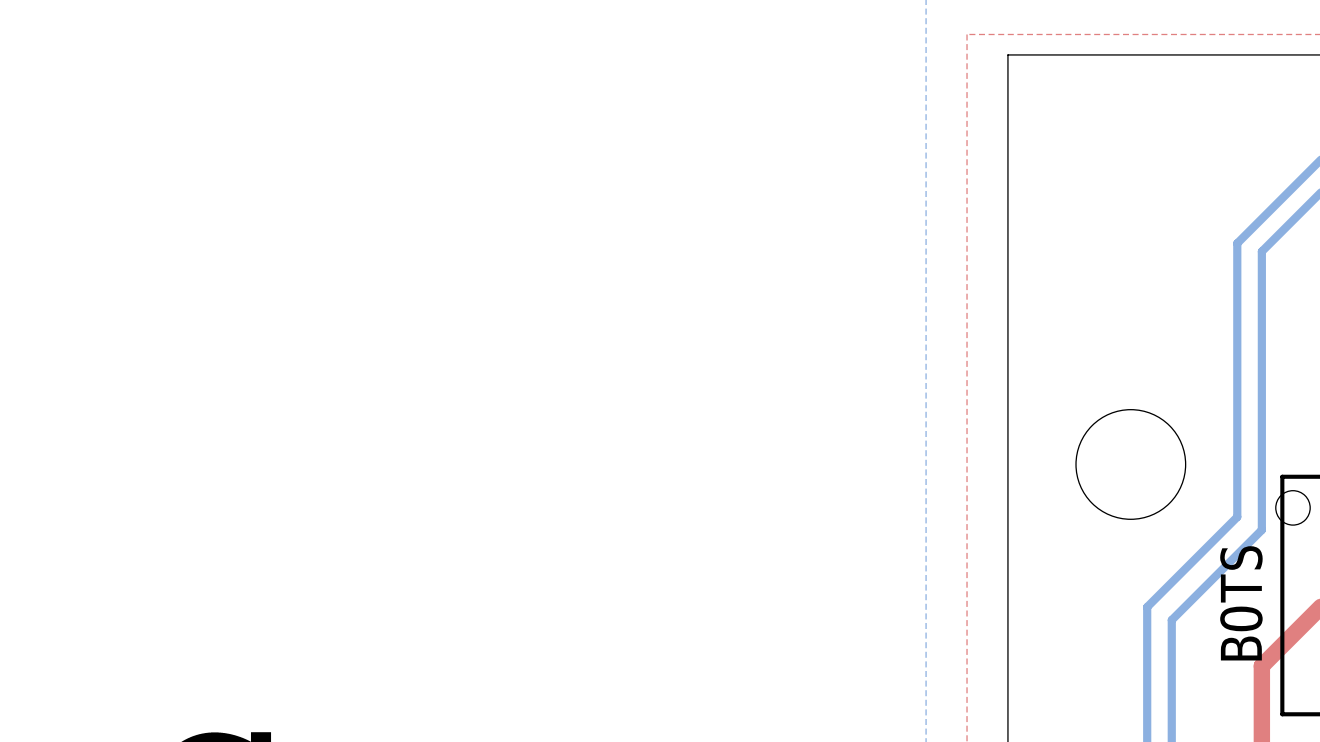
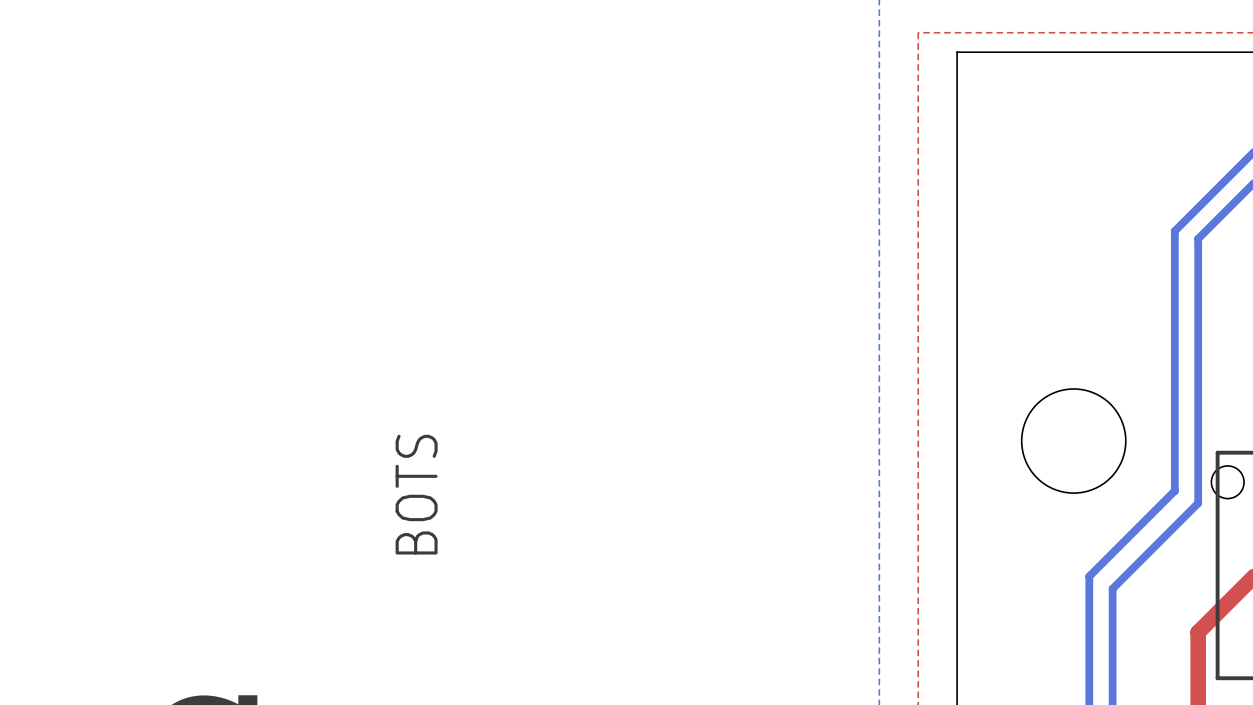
text: none -> BOTS (416, 494)
text: BOTS (1241, 603) -> none

